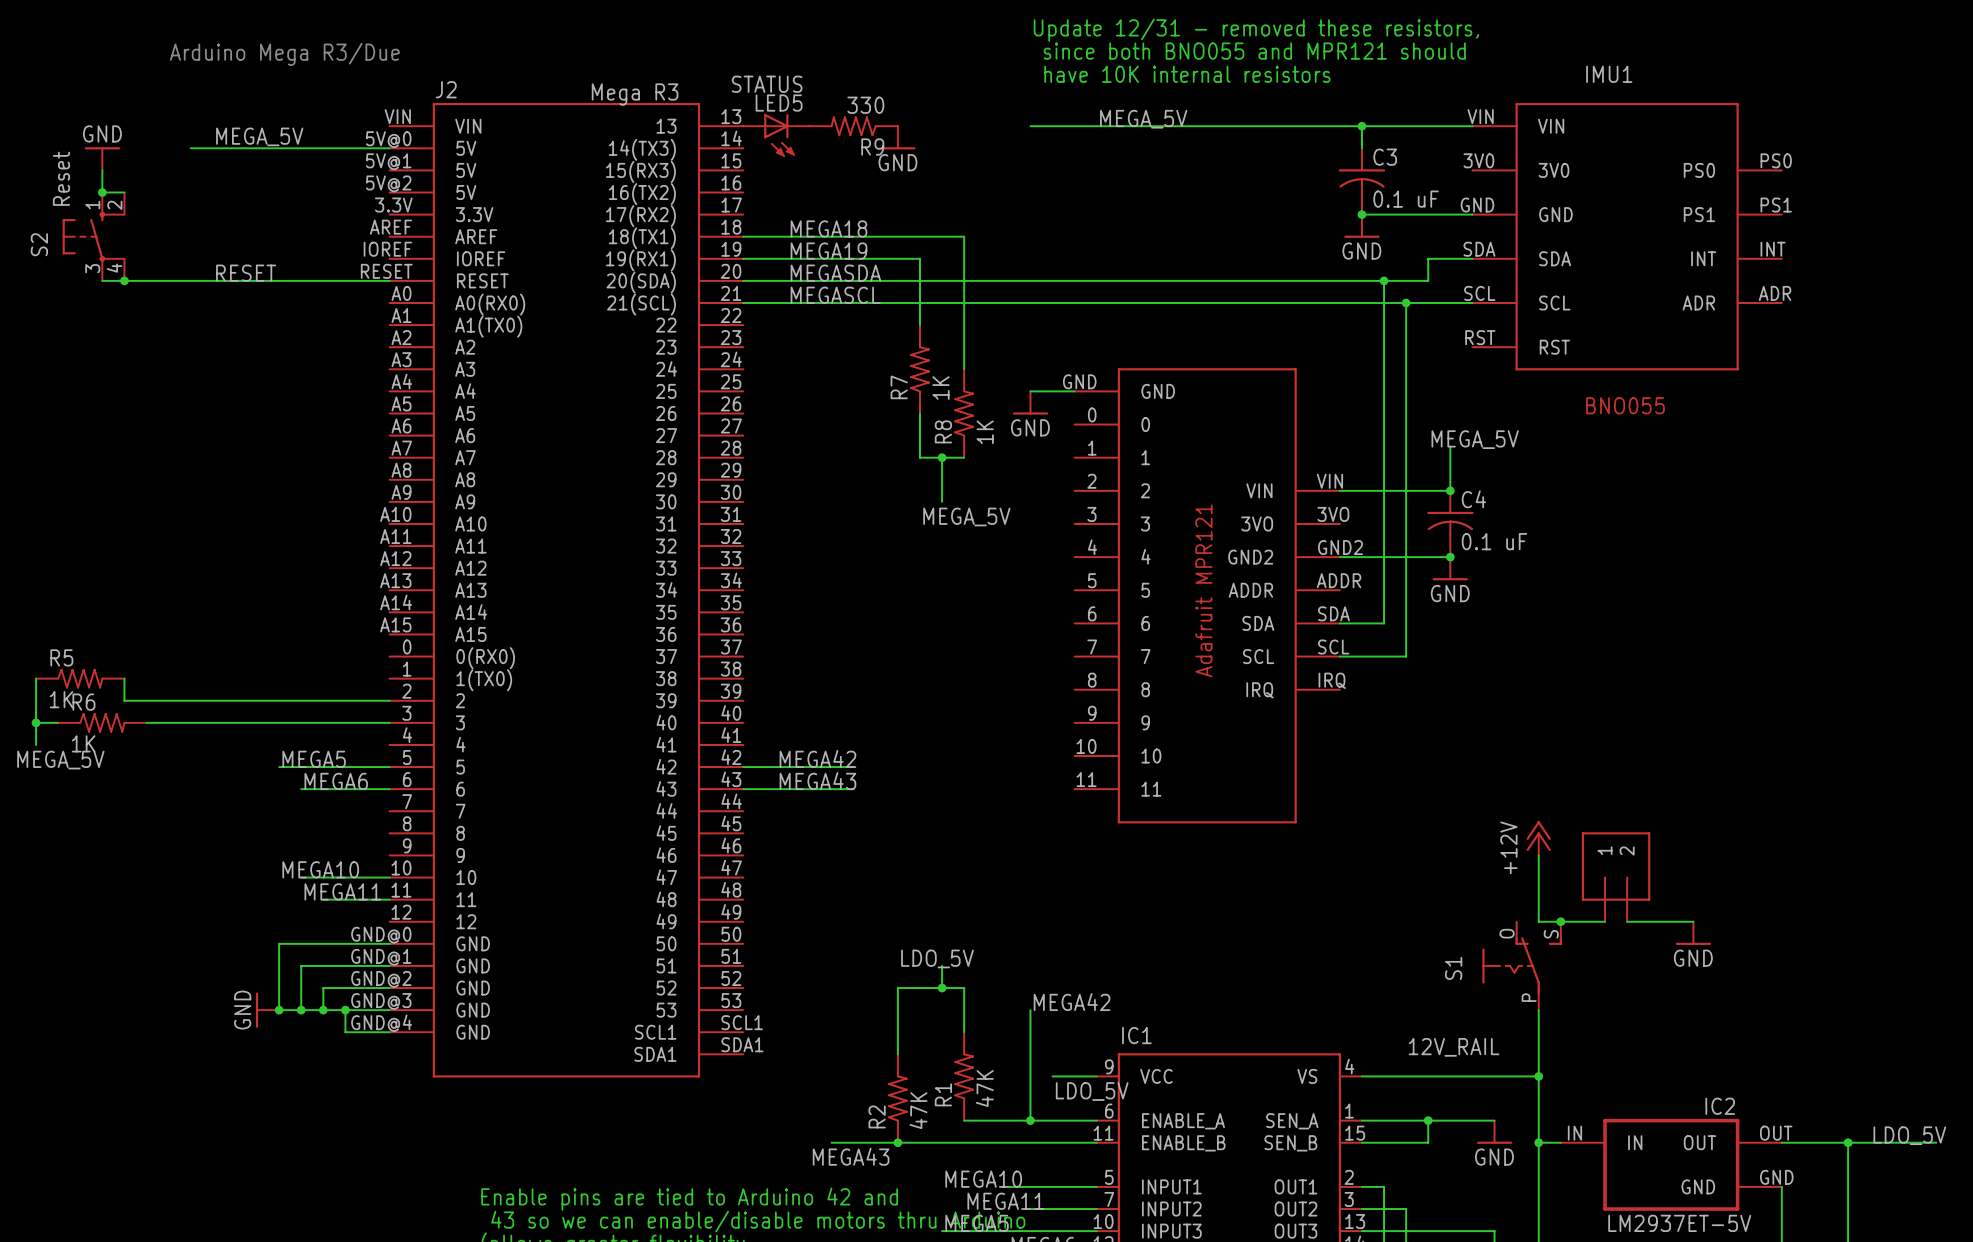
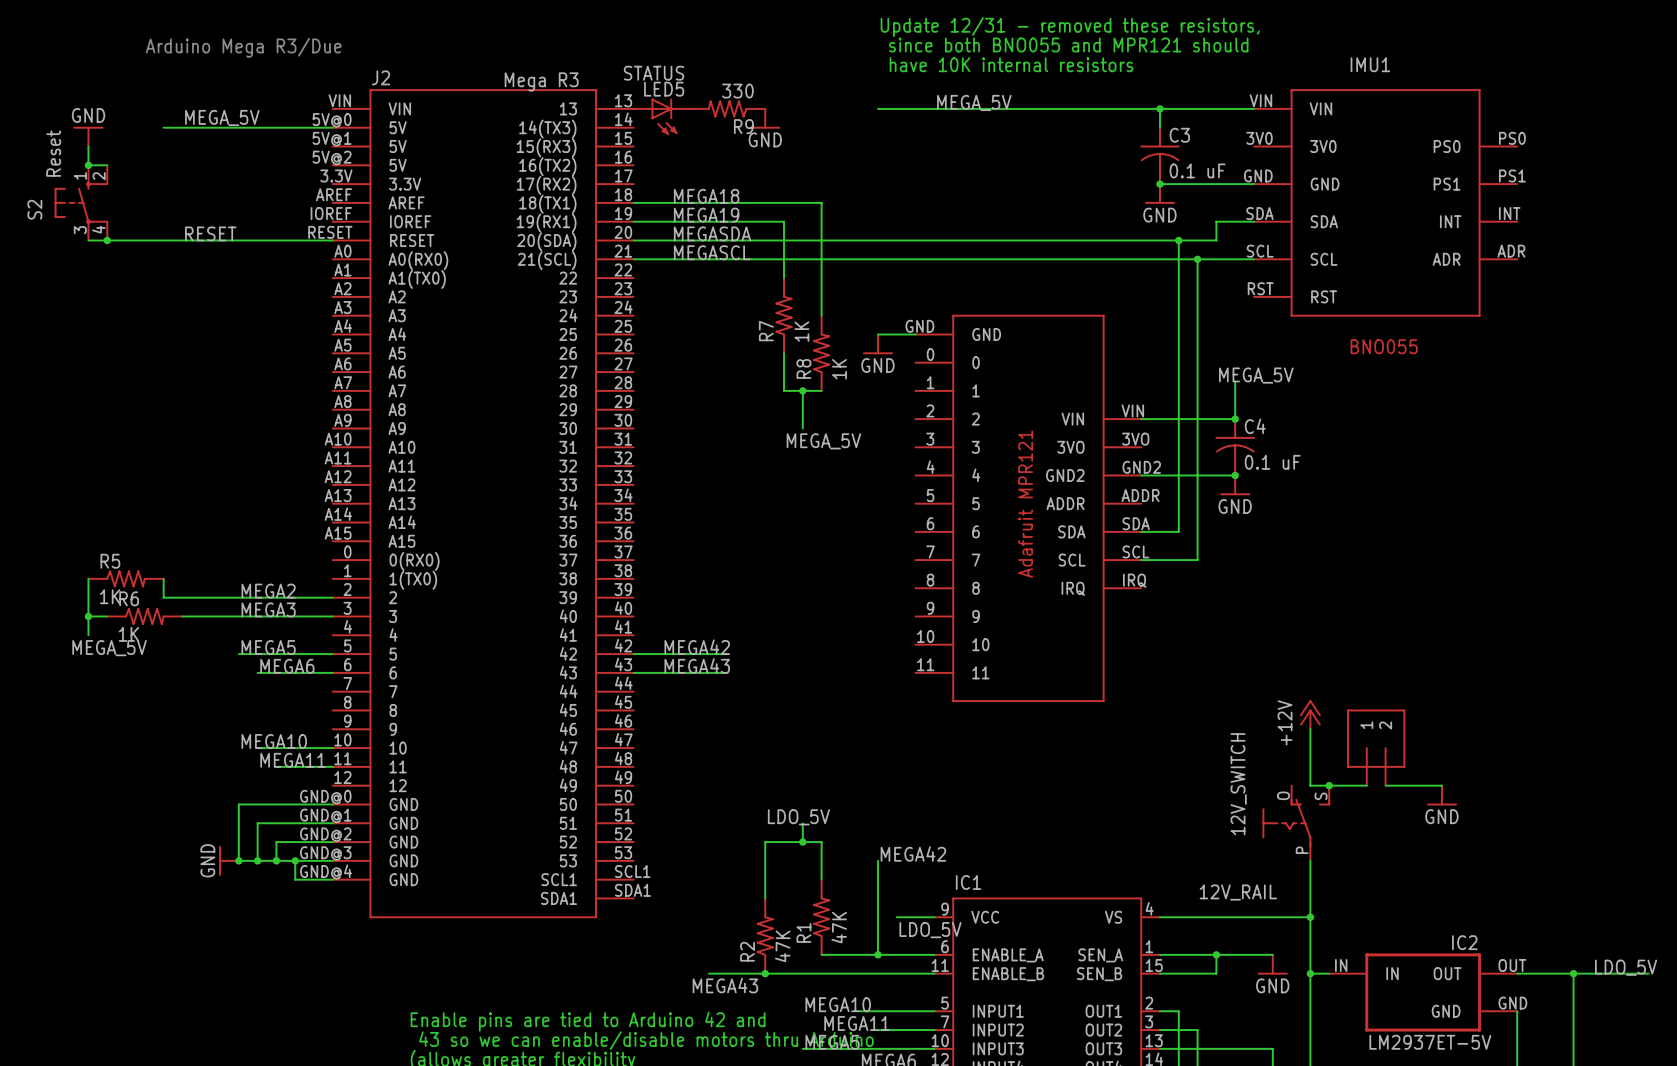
wire: (36, 678) (36, 744) -> (88, 578) (88, 635)
R5 position: (80, 678) -> (126, 578)
wire: (124, 678) (124, 700) (190, 700) -> (163, 578) (163, 597)
label: none -> MEGA2 (268, 591)
label: none -> MEGA3 (268, 609)
wire: (36, 722) (58, 722) -> (88, 616) (107, 616)
junction: (36, 722) -> none
R6 position: (102, 722) -> (144, 616)
junction: none -> (88, 616)
label position: MEGA_5V (60, 760) -> MEGA_5V (109, 648)
S1 name: S1 (1453, 968) -> 12V_SWITCH (1238, 784)

